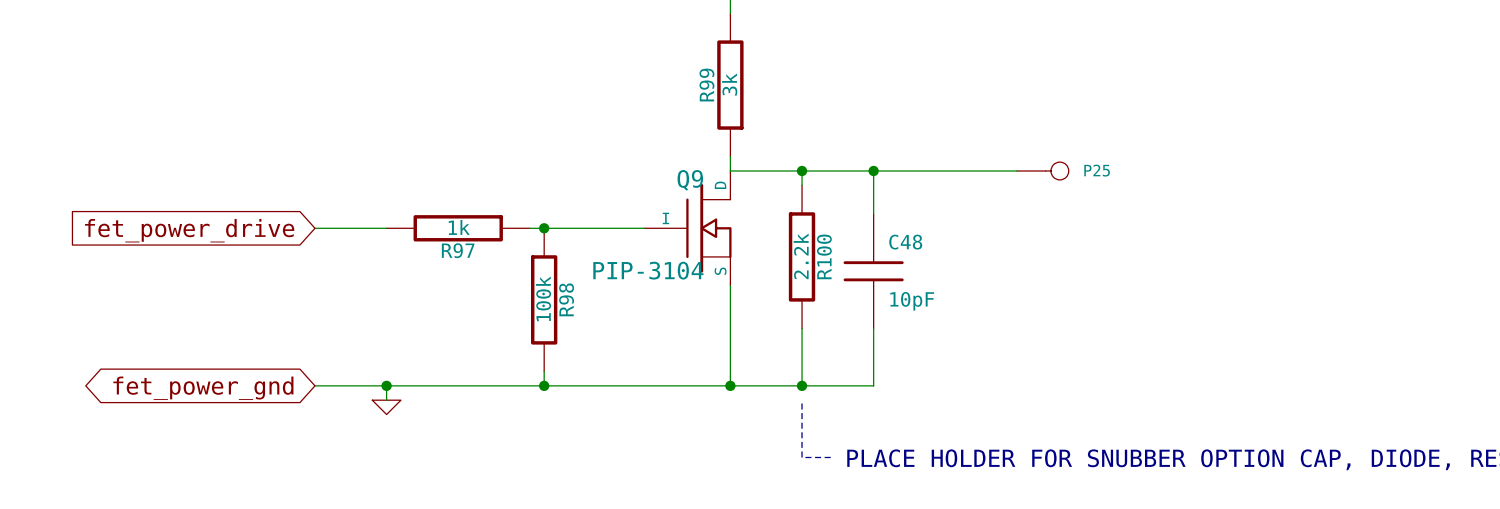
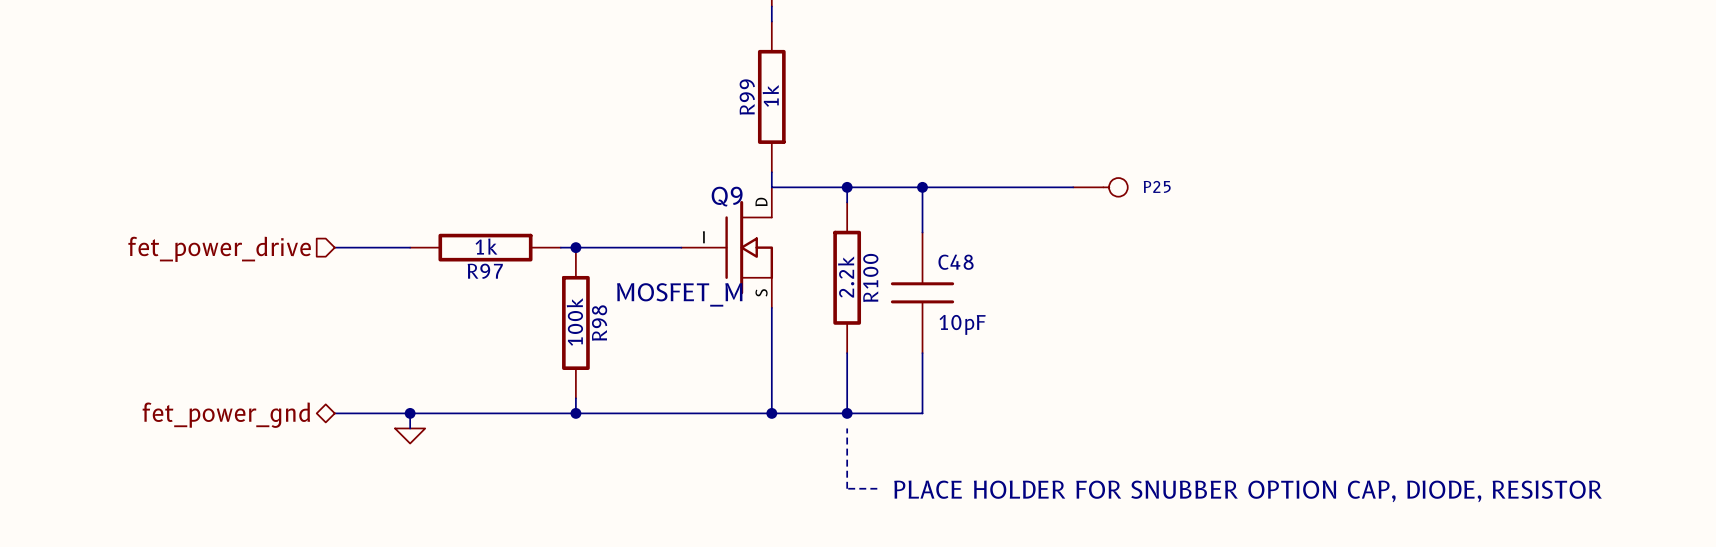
R99 value: 3k (729, 84) -> 1k (770, 95)
hierarchical label: none -> fet_power_drive (219, 249)
global label: fet_power_drive (189, 230) -> none
Q9 value: PIP-3104 (648, 270) -> MOSFET_M (679, 294)
hierarchical label: none -> fet_power_gnd (226, 415)
global label: fet_power_gnd (203, 388) -> none

